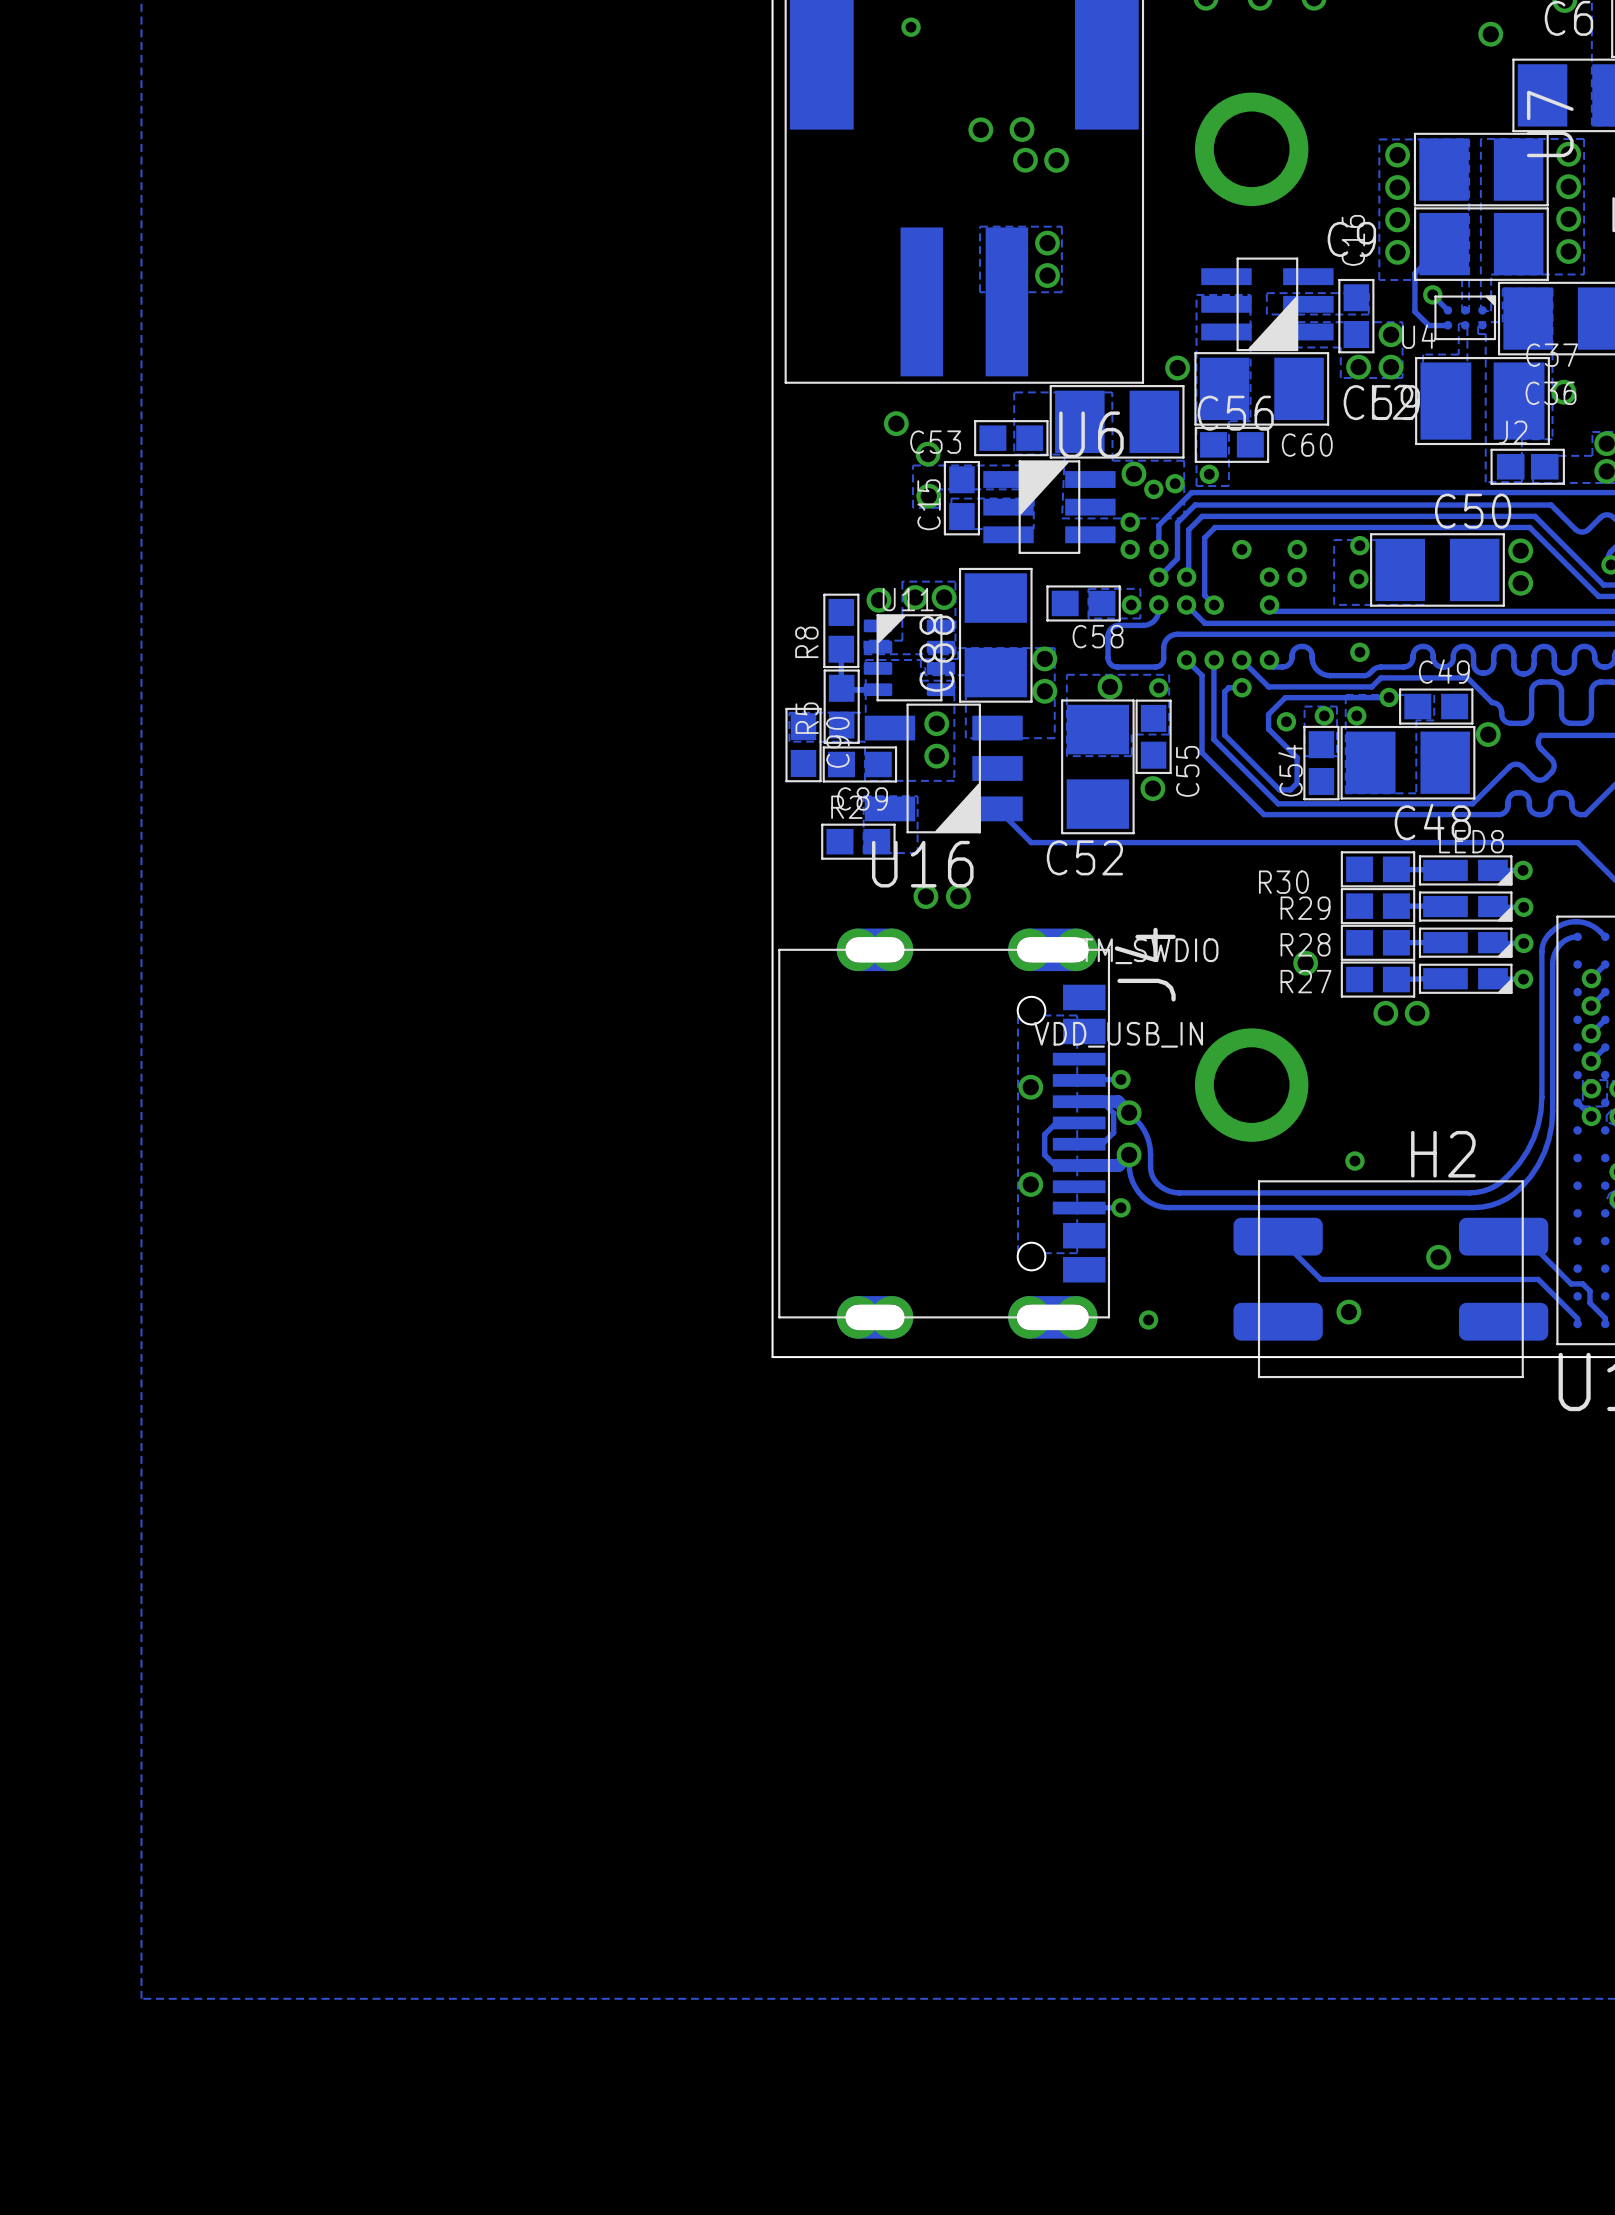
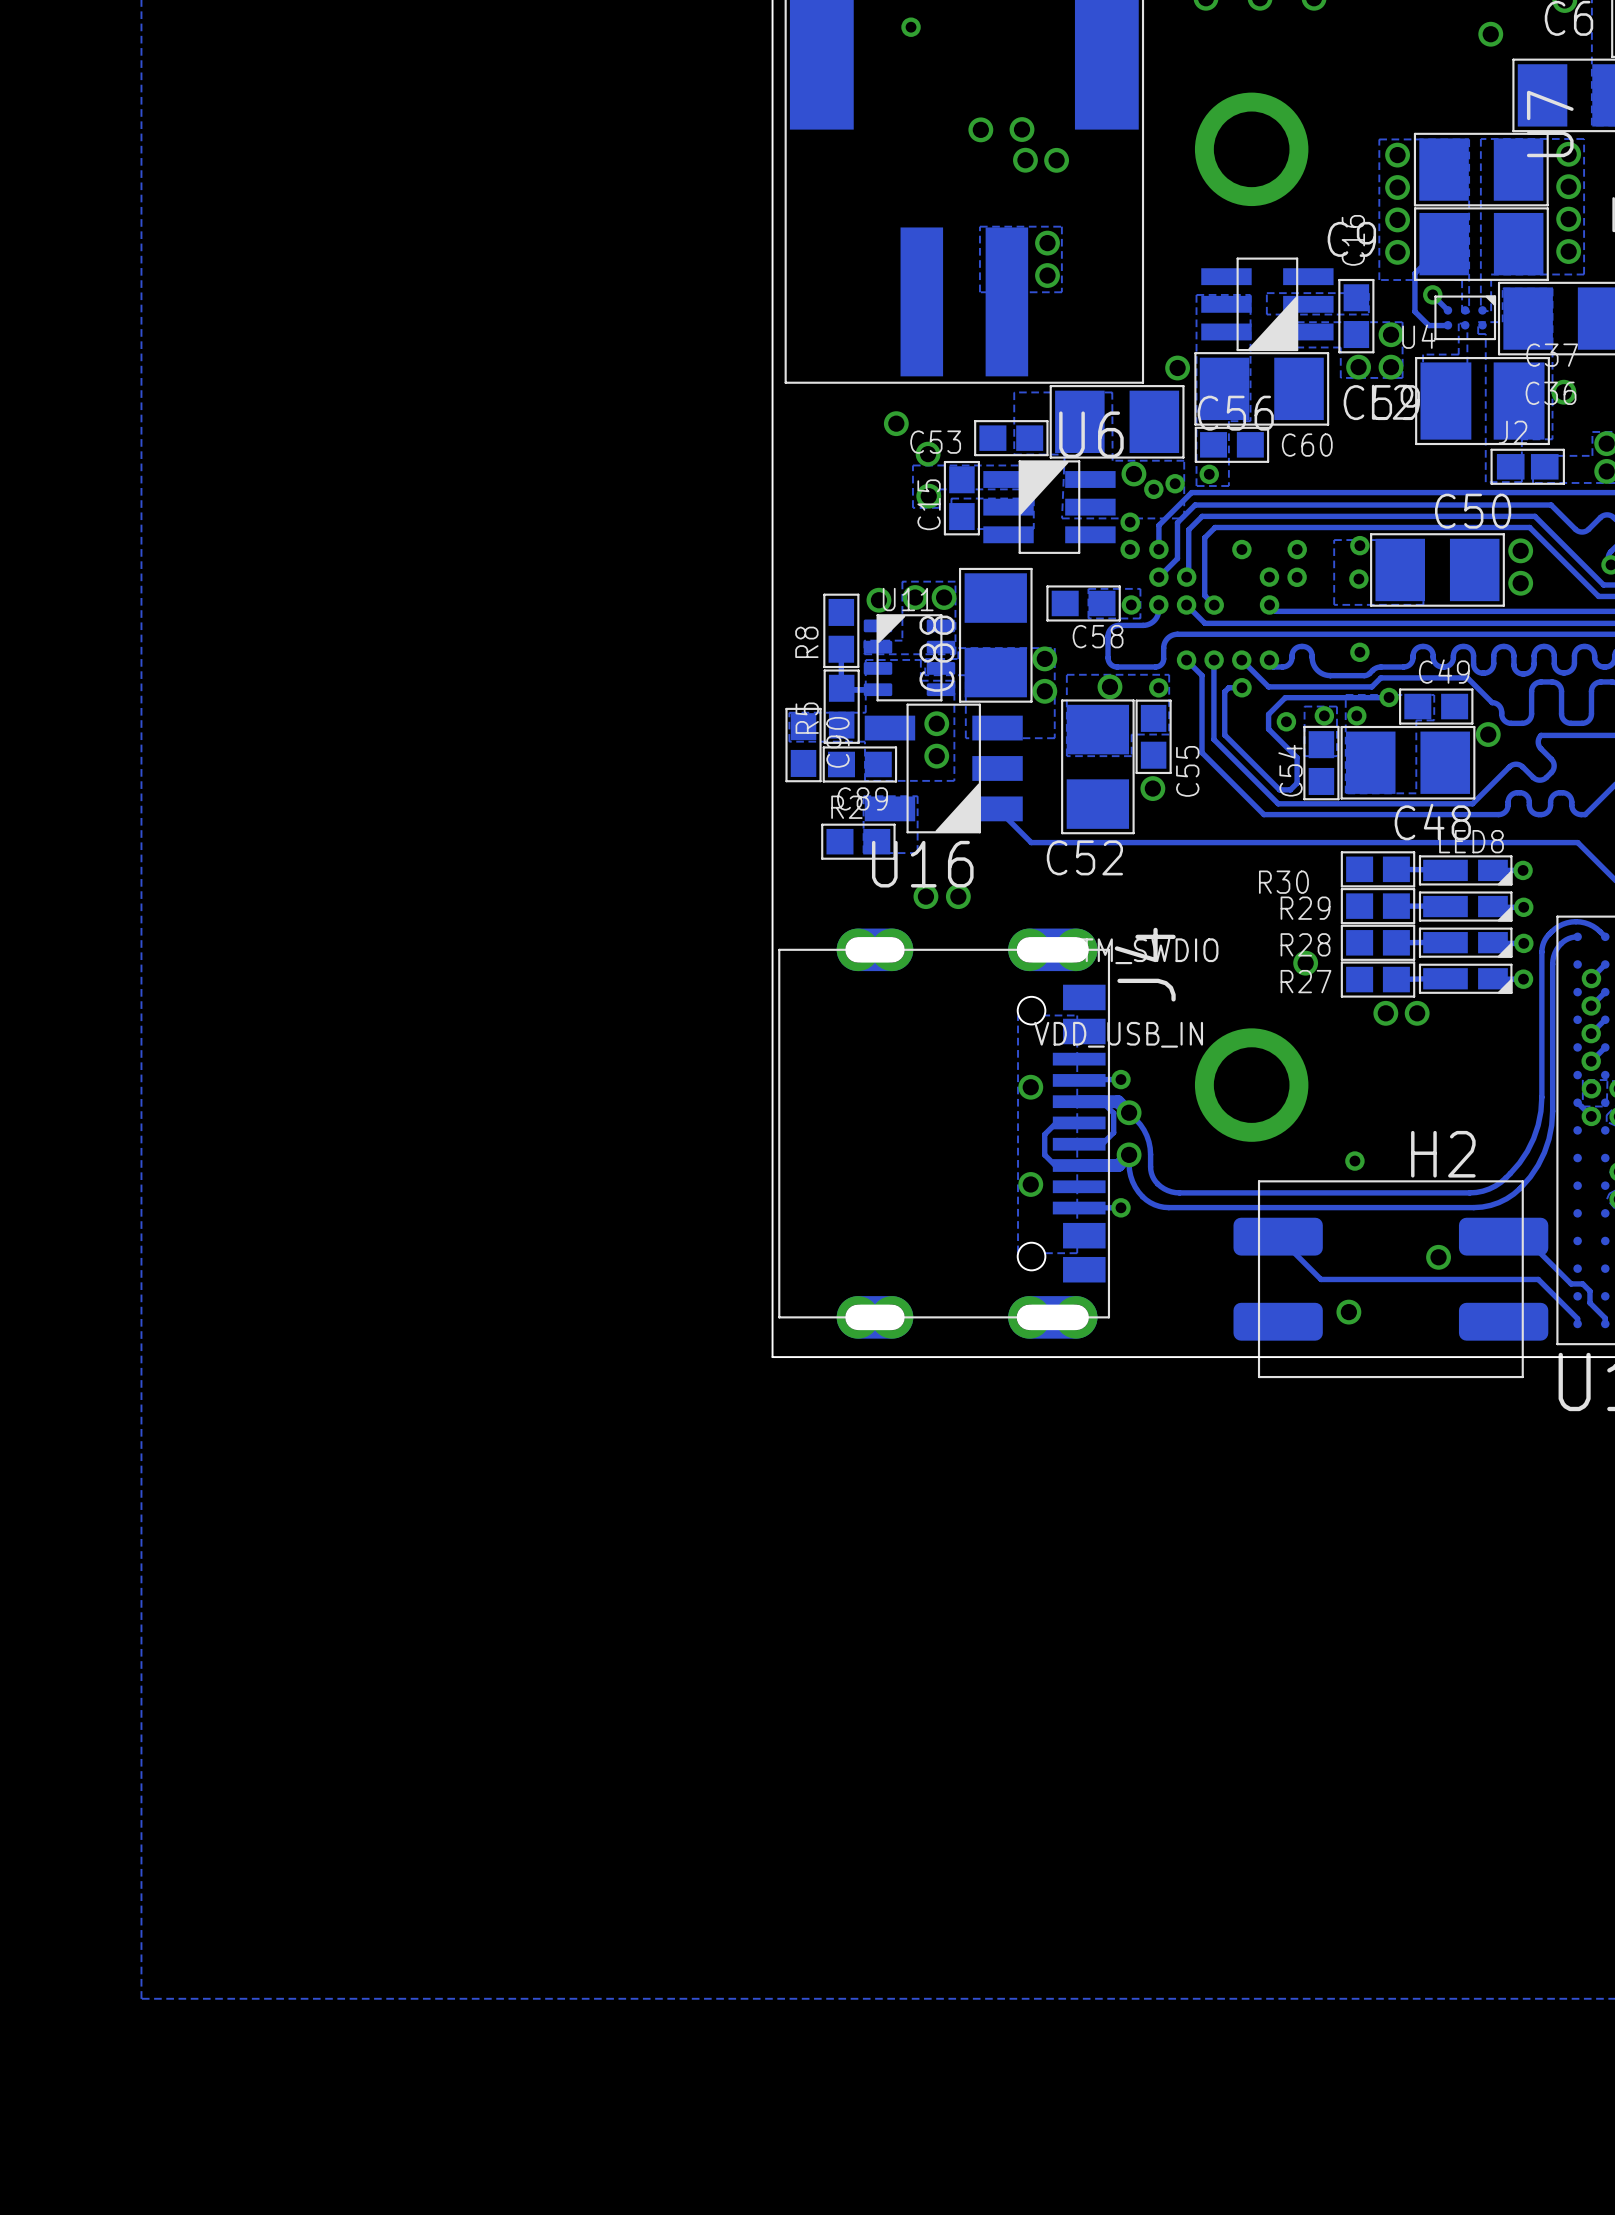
via: (1148, 1319) -> none

